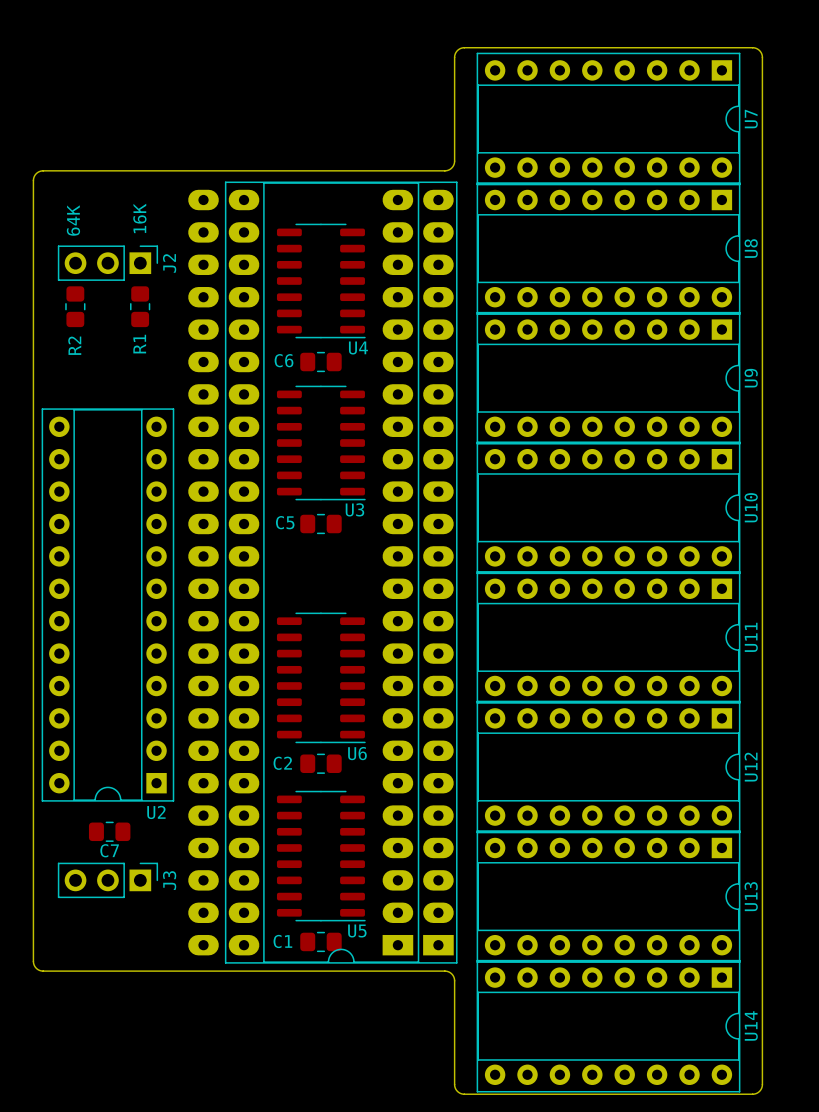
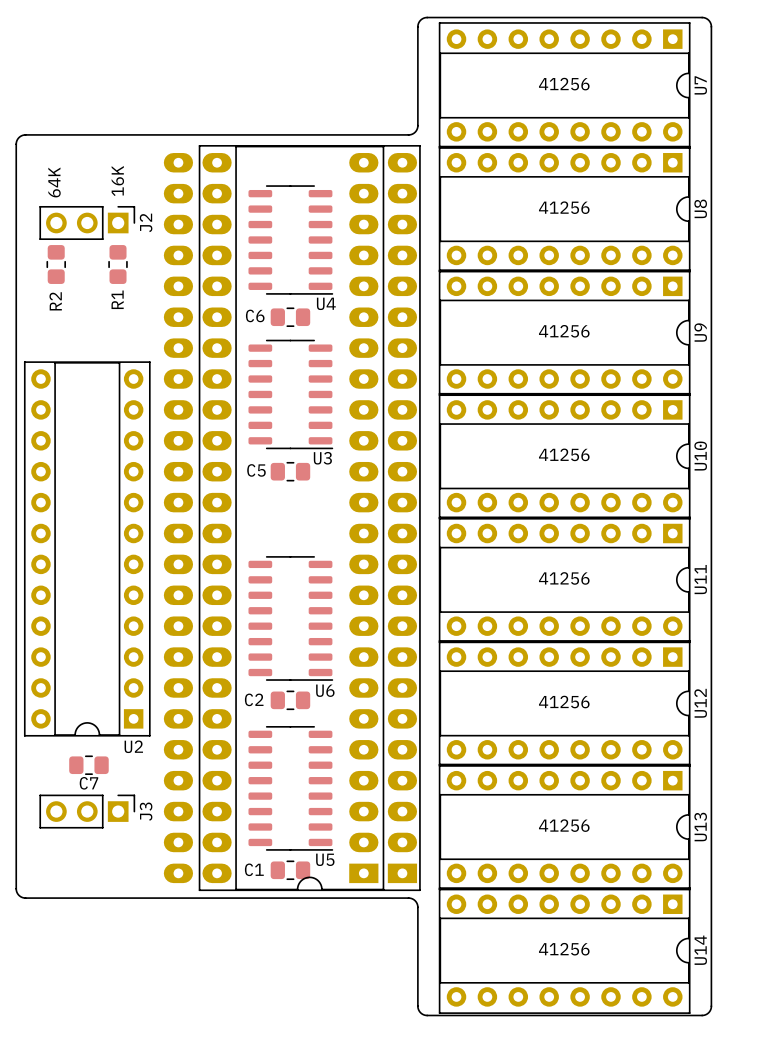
U7 value: none -> 41256 (564, 84)
U8 value: none -> 41256 (564, 207)
U9 value: none -> 41256 (564, 331)
U10 value: none -> 41256 (564, 454)
U11 value: none -> 41256 (564, 578)
U12 value: none -> 41256 (564, 702)
U13 value: none -> 41256 (564, 825)
U14 value: none -> 41256 (564, 949)

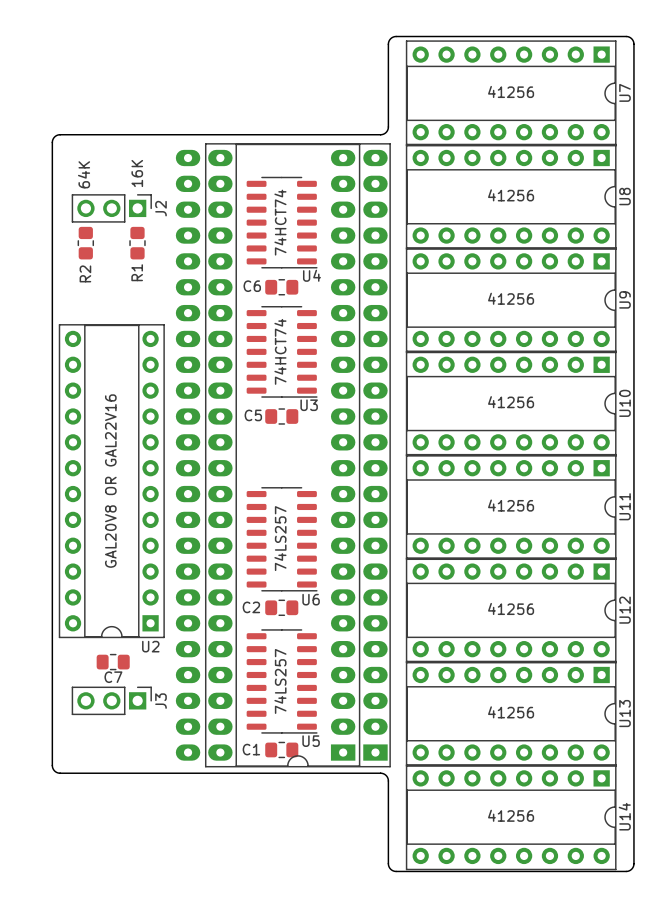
U4 value: none -> 74HCT74 (280, 222)
U3 value: none -> 74HCT74 (280, 351)
text: none -> GAL20V8 OR GAL22V16 (110, 481)
U6 value: none -> 74LS257 (280, 538)
U5 value: none -> 74LS257 (280, 681)

